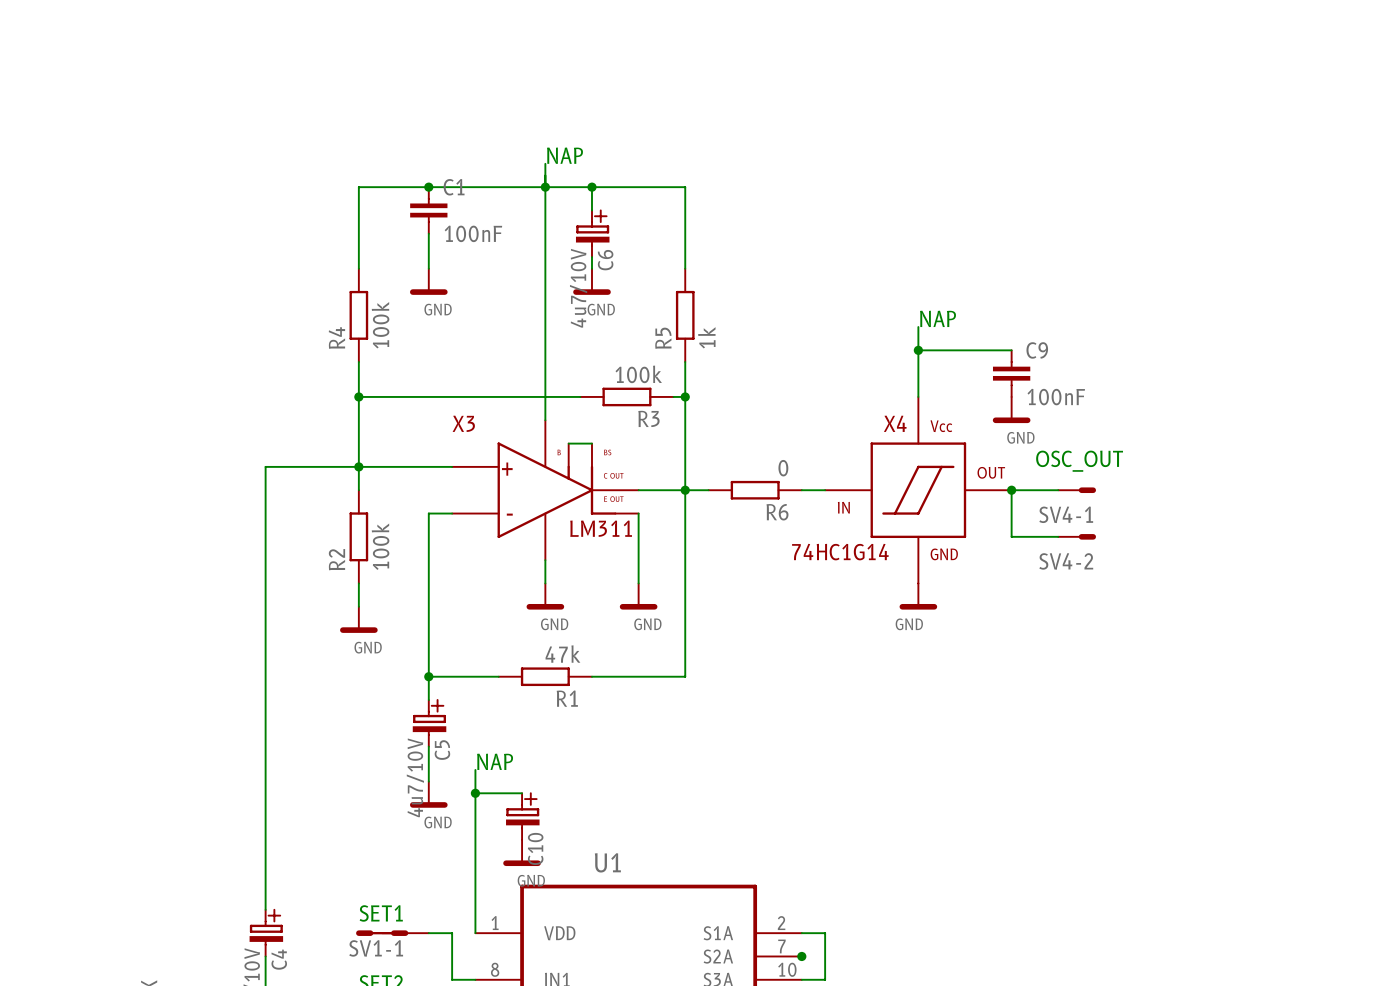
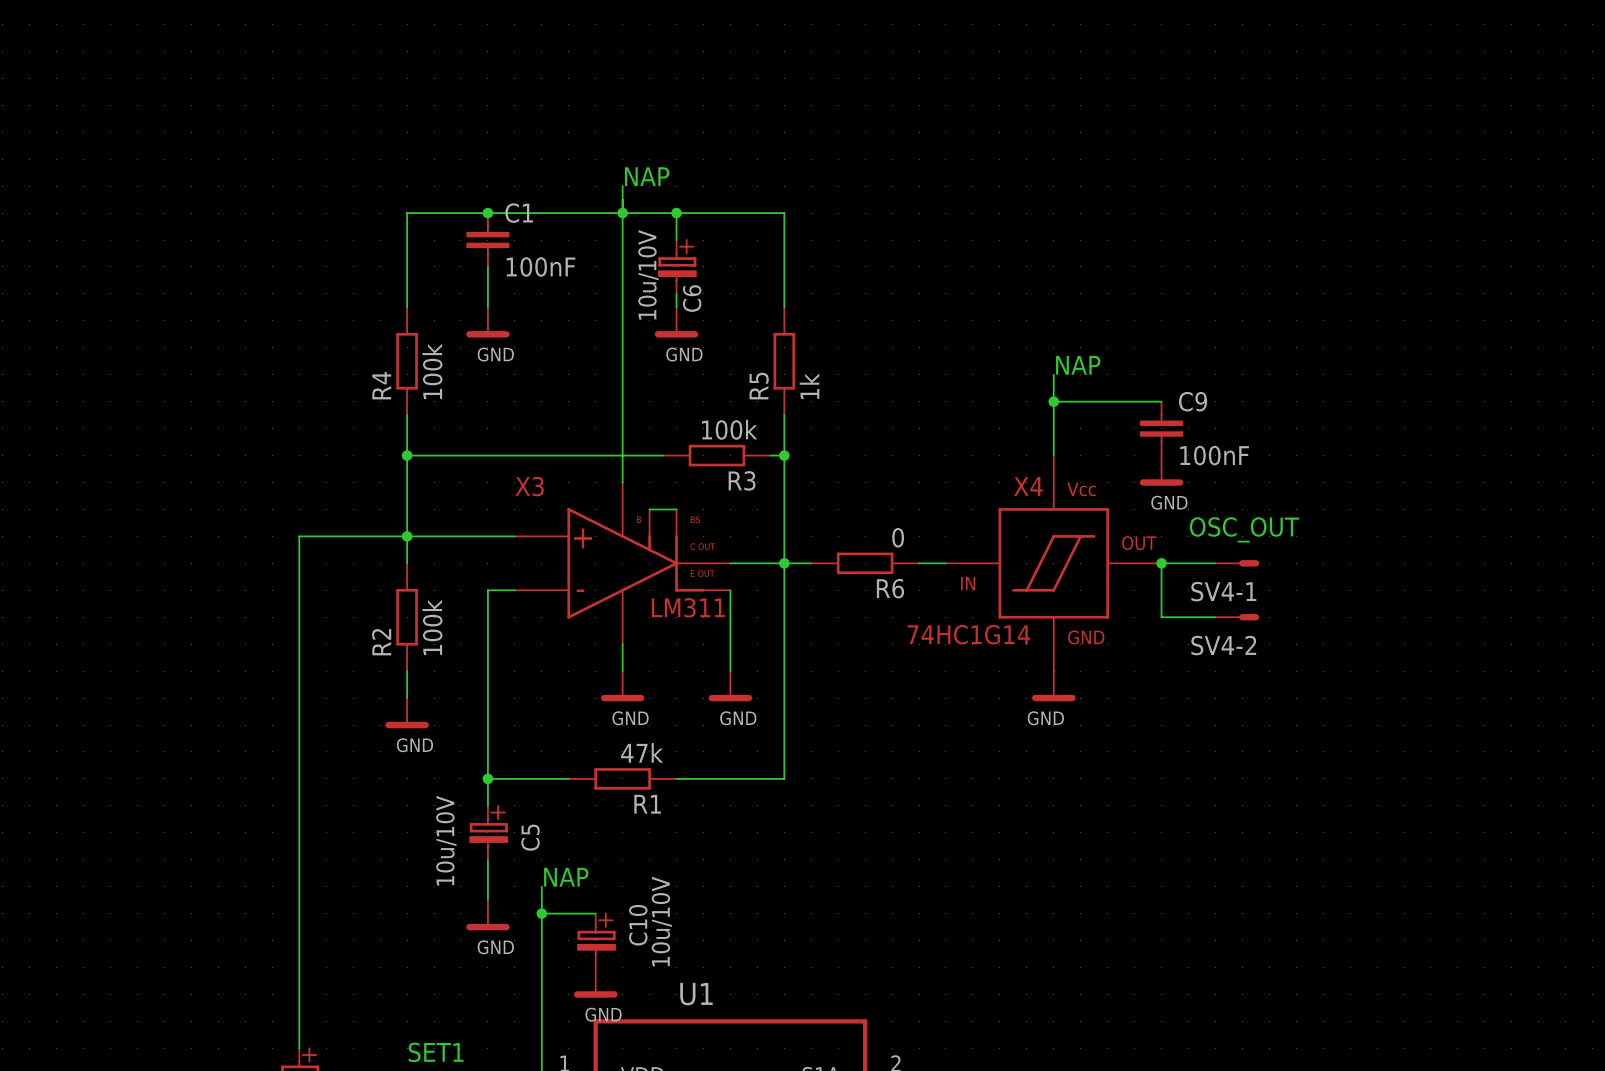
C6 value: 4u7/10V (578, 288) -> 10u/10V (648, 274)
C5 name position: C5 (442, 750) -> C5 (530, 837)
C5 value: 4u7/10V (415, 777) -> 10u/10V (446, 840)
C10 value: none -> 10u/10V (661, 921)
C10 name position: C10 (535, 848) -> C10 (638, 925)

